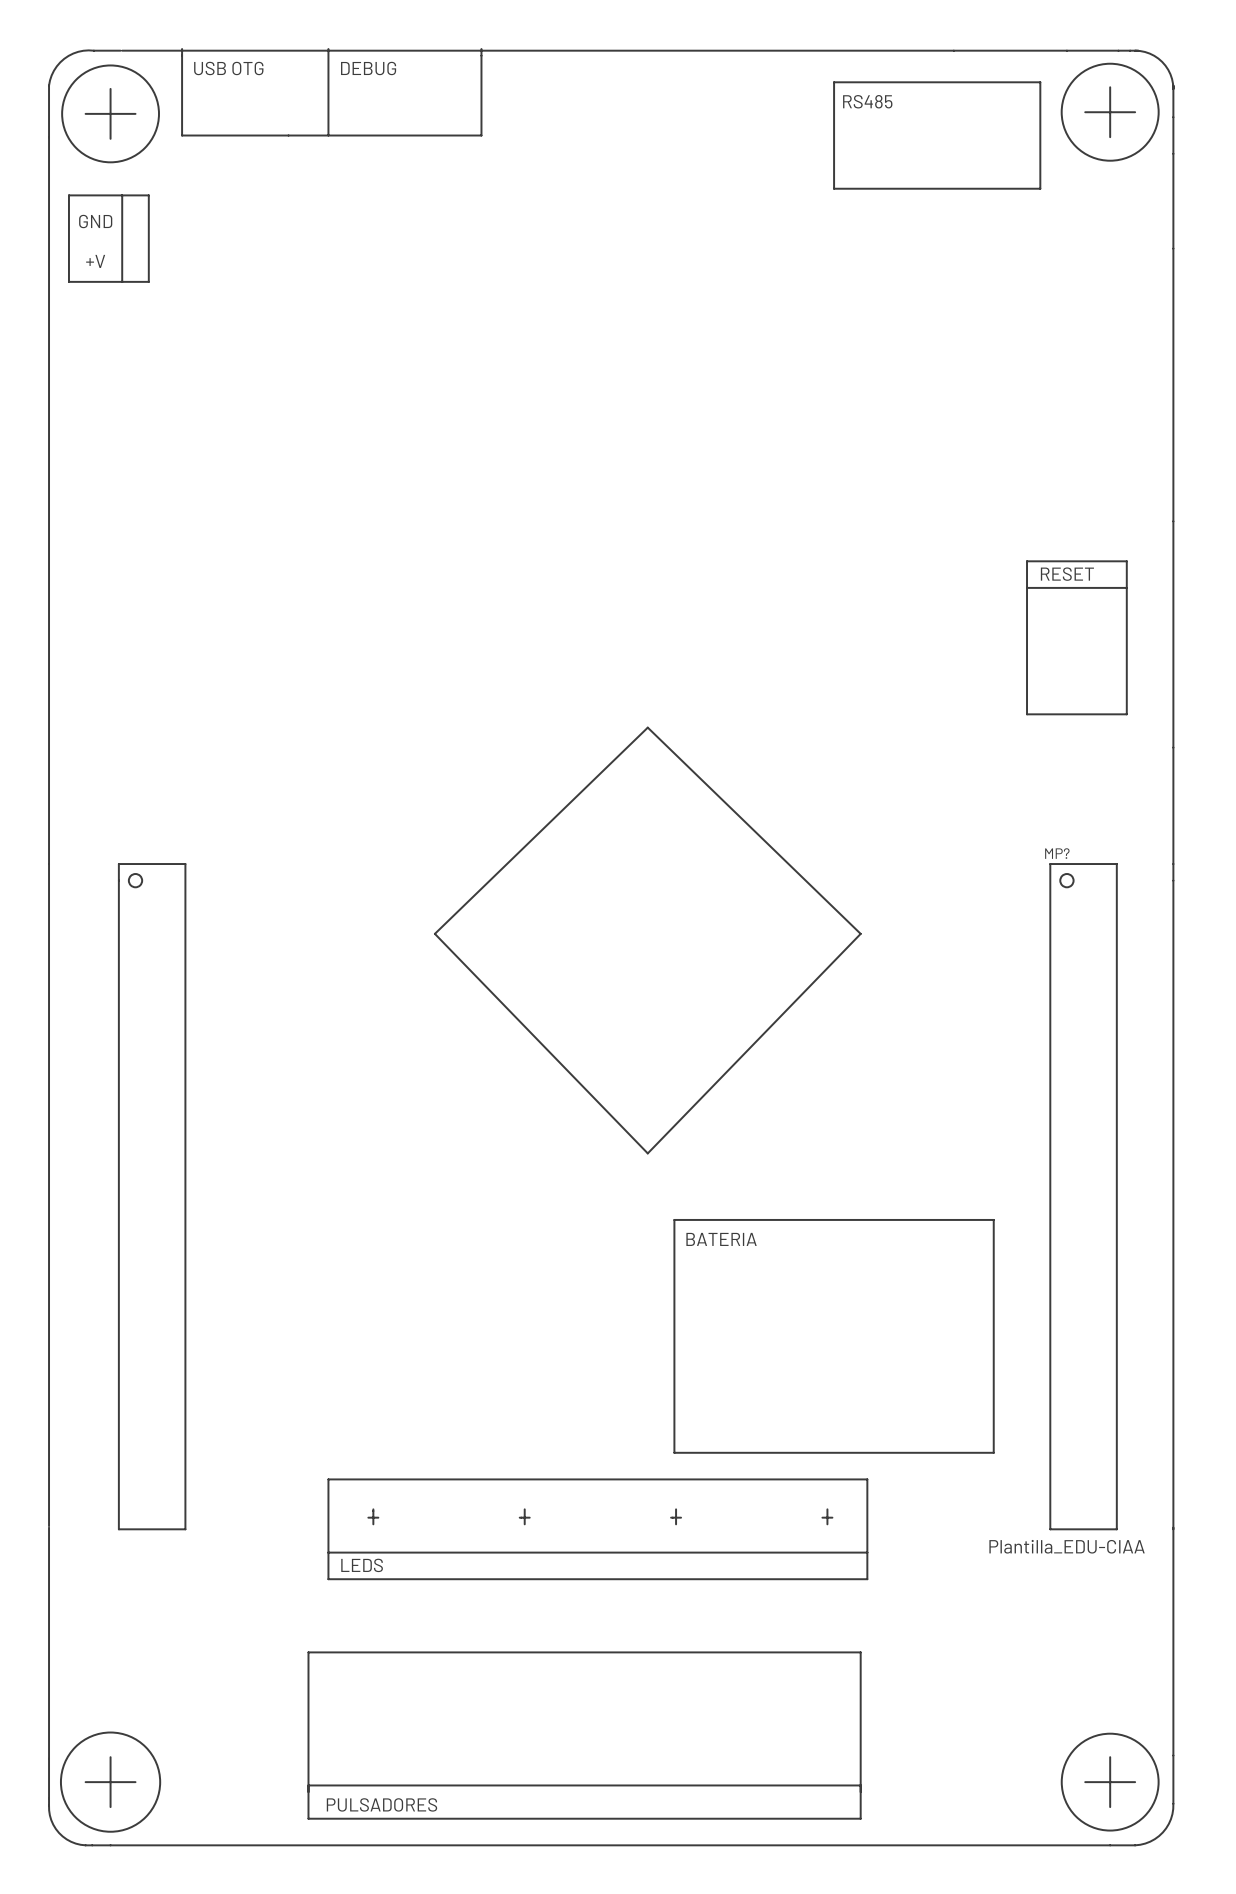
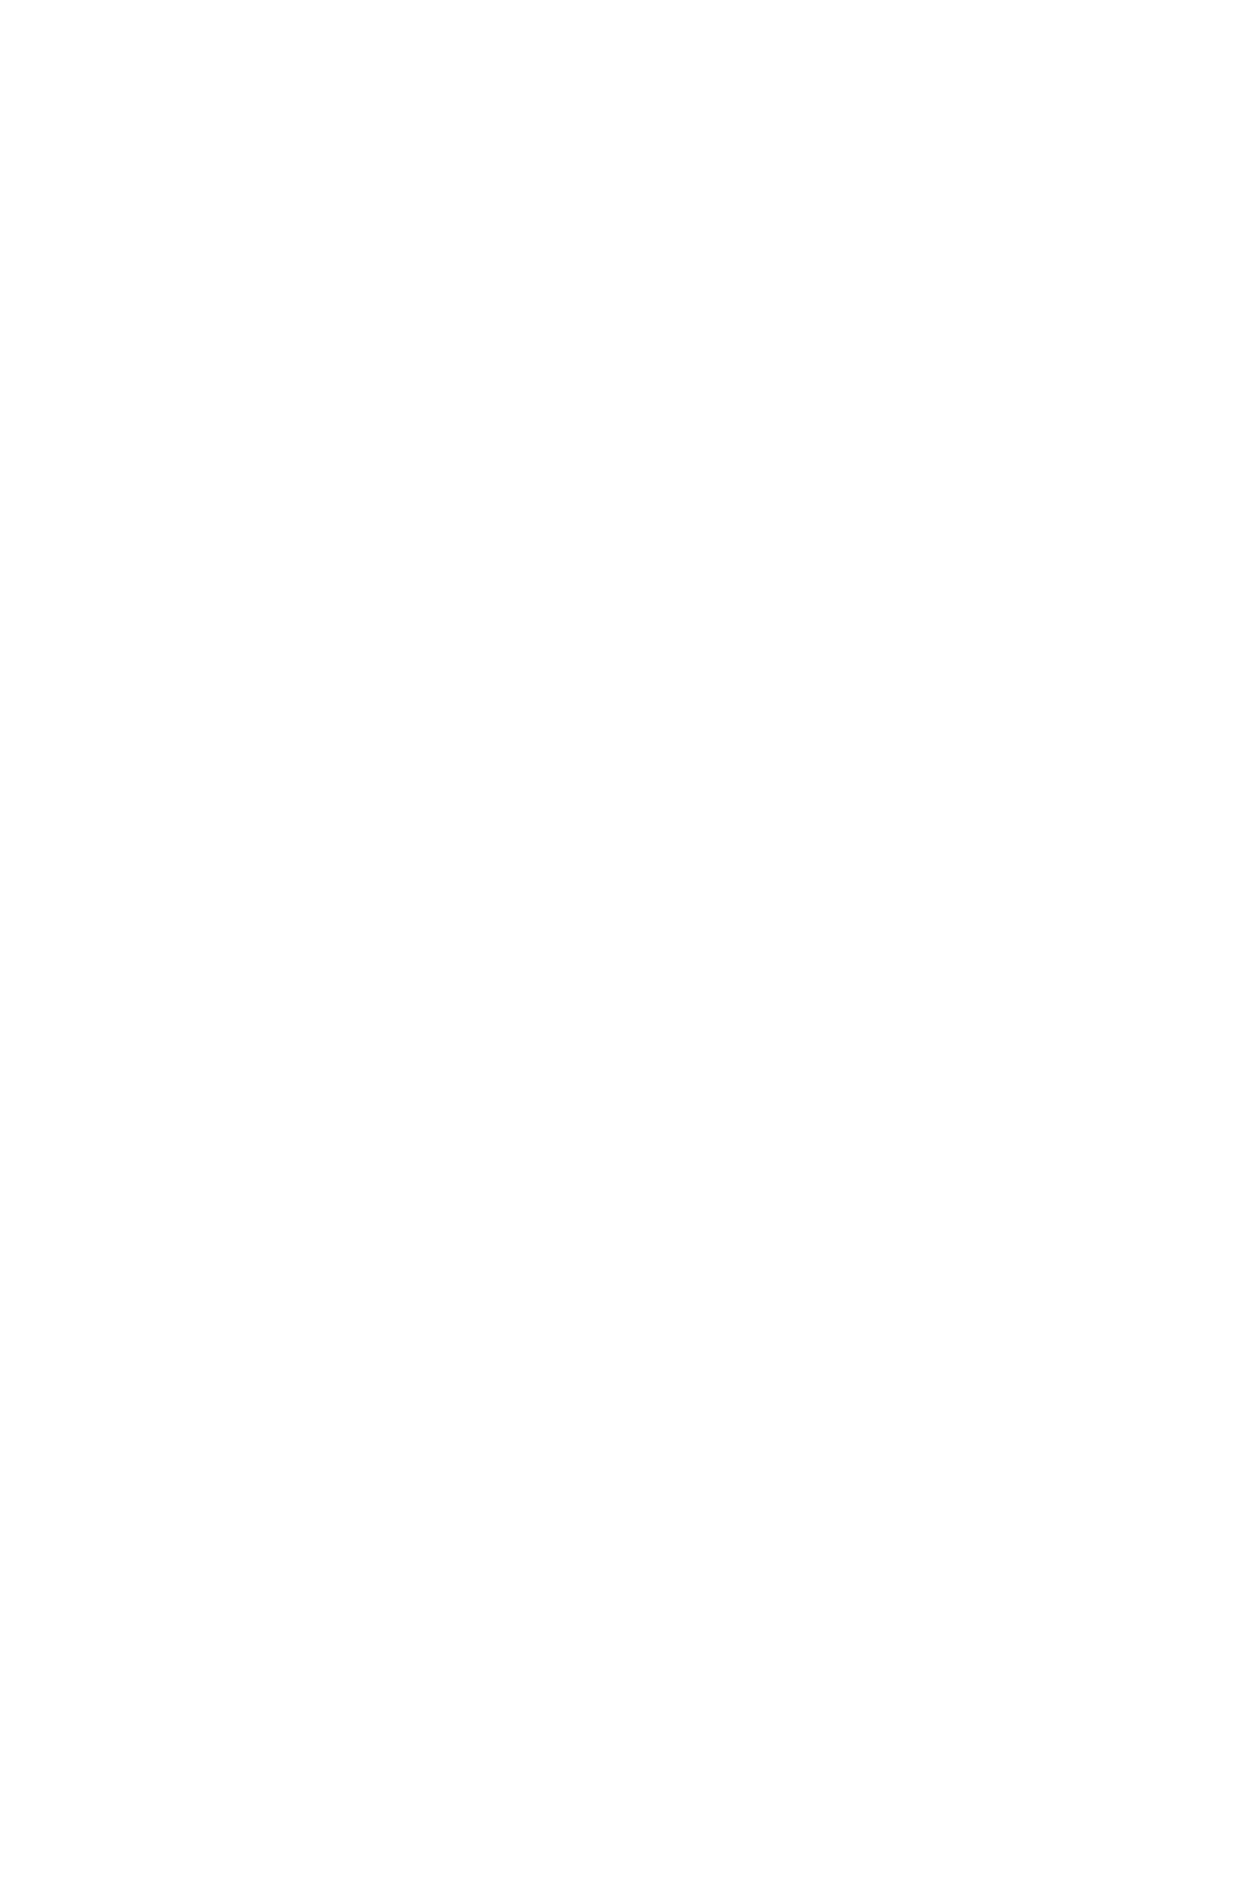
MP?: Plantilla_EDU-CIAA (611, 947) -> none

